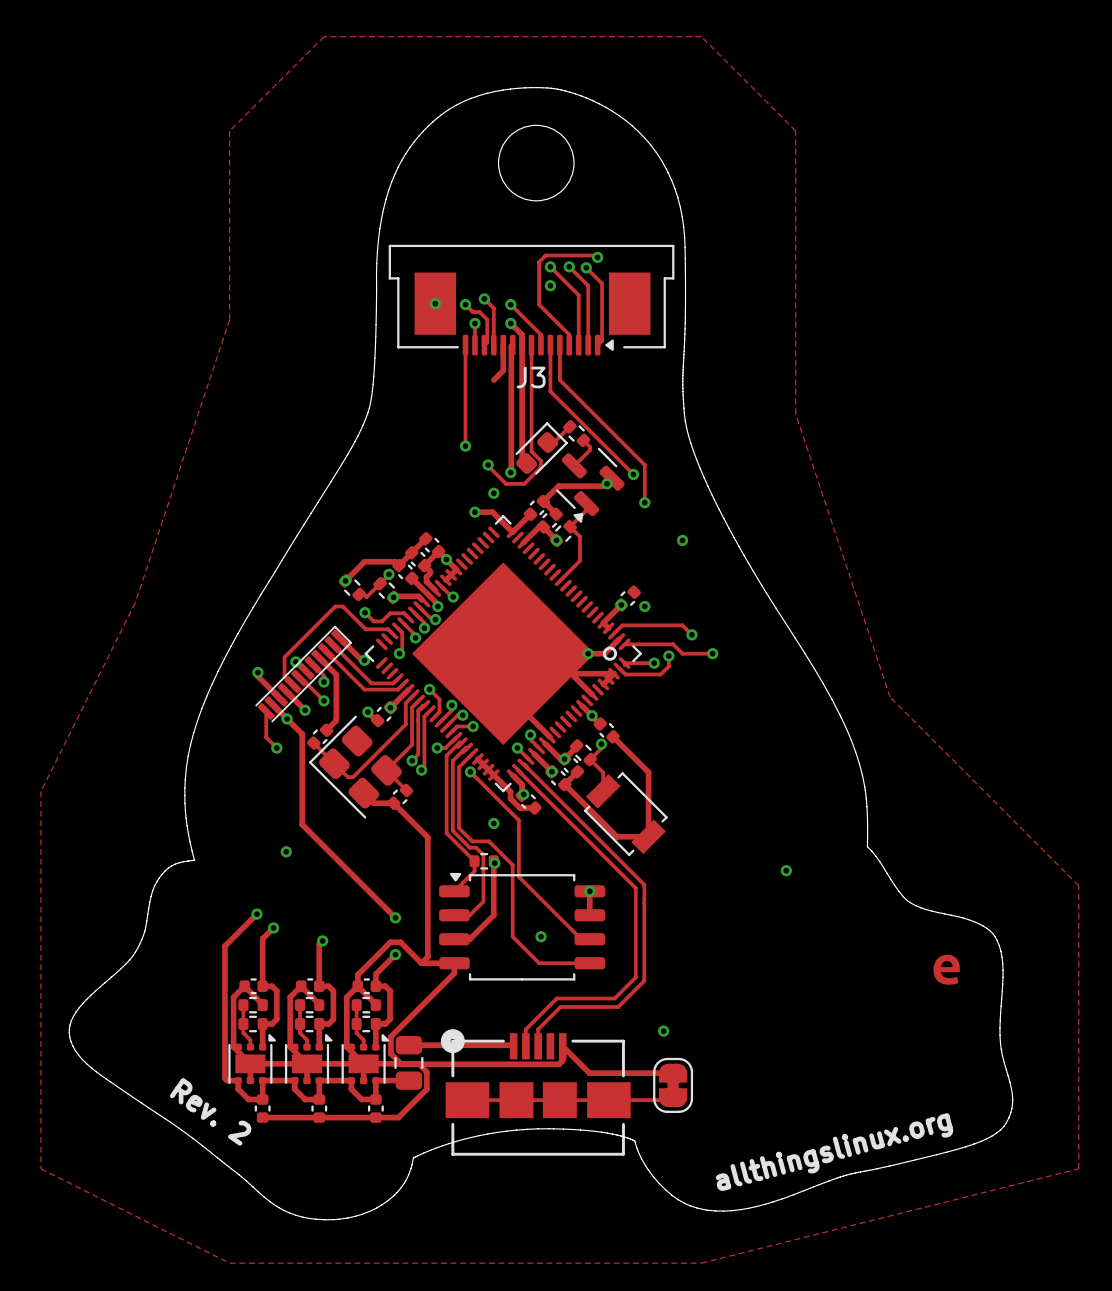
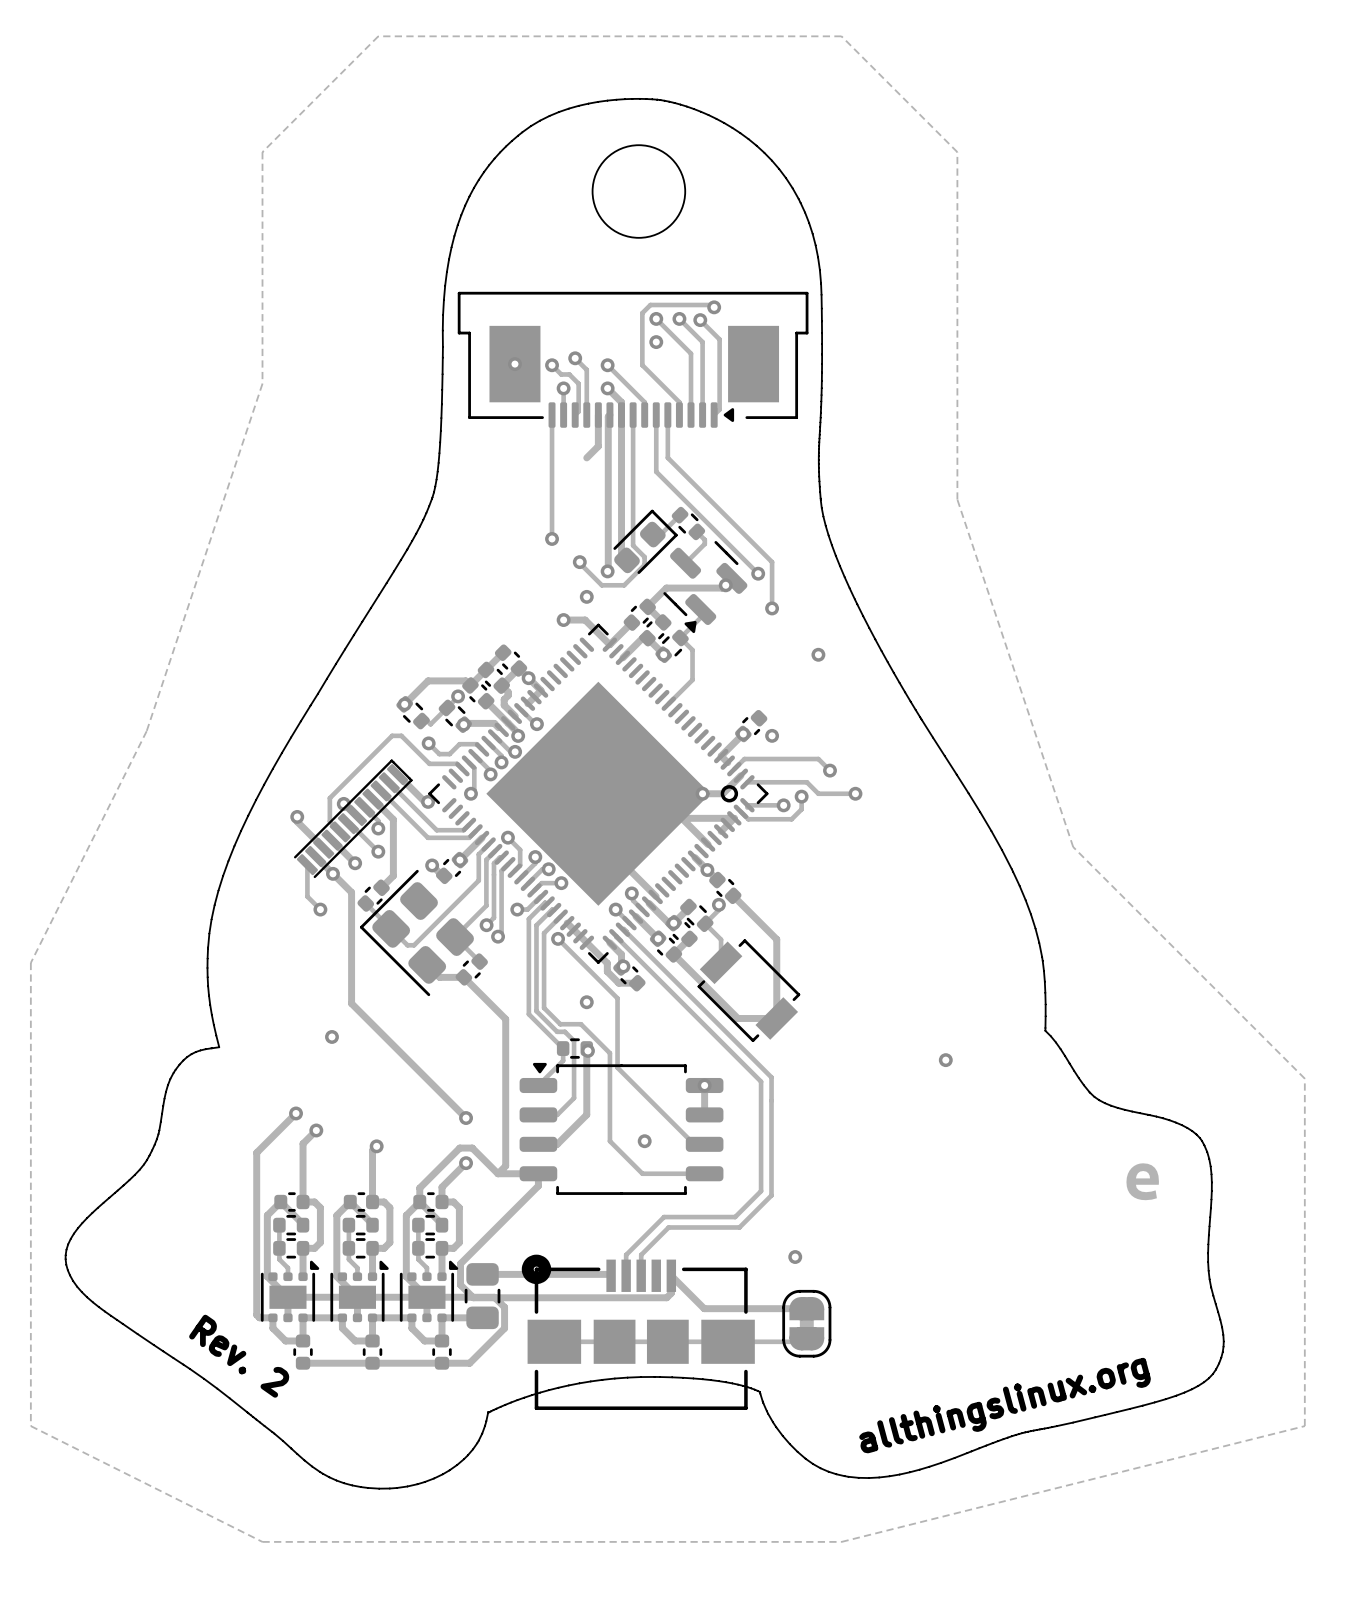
J3 name: J3 (531, 377) -> none

